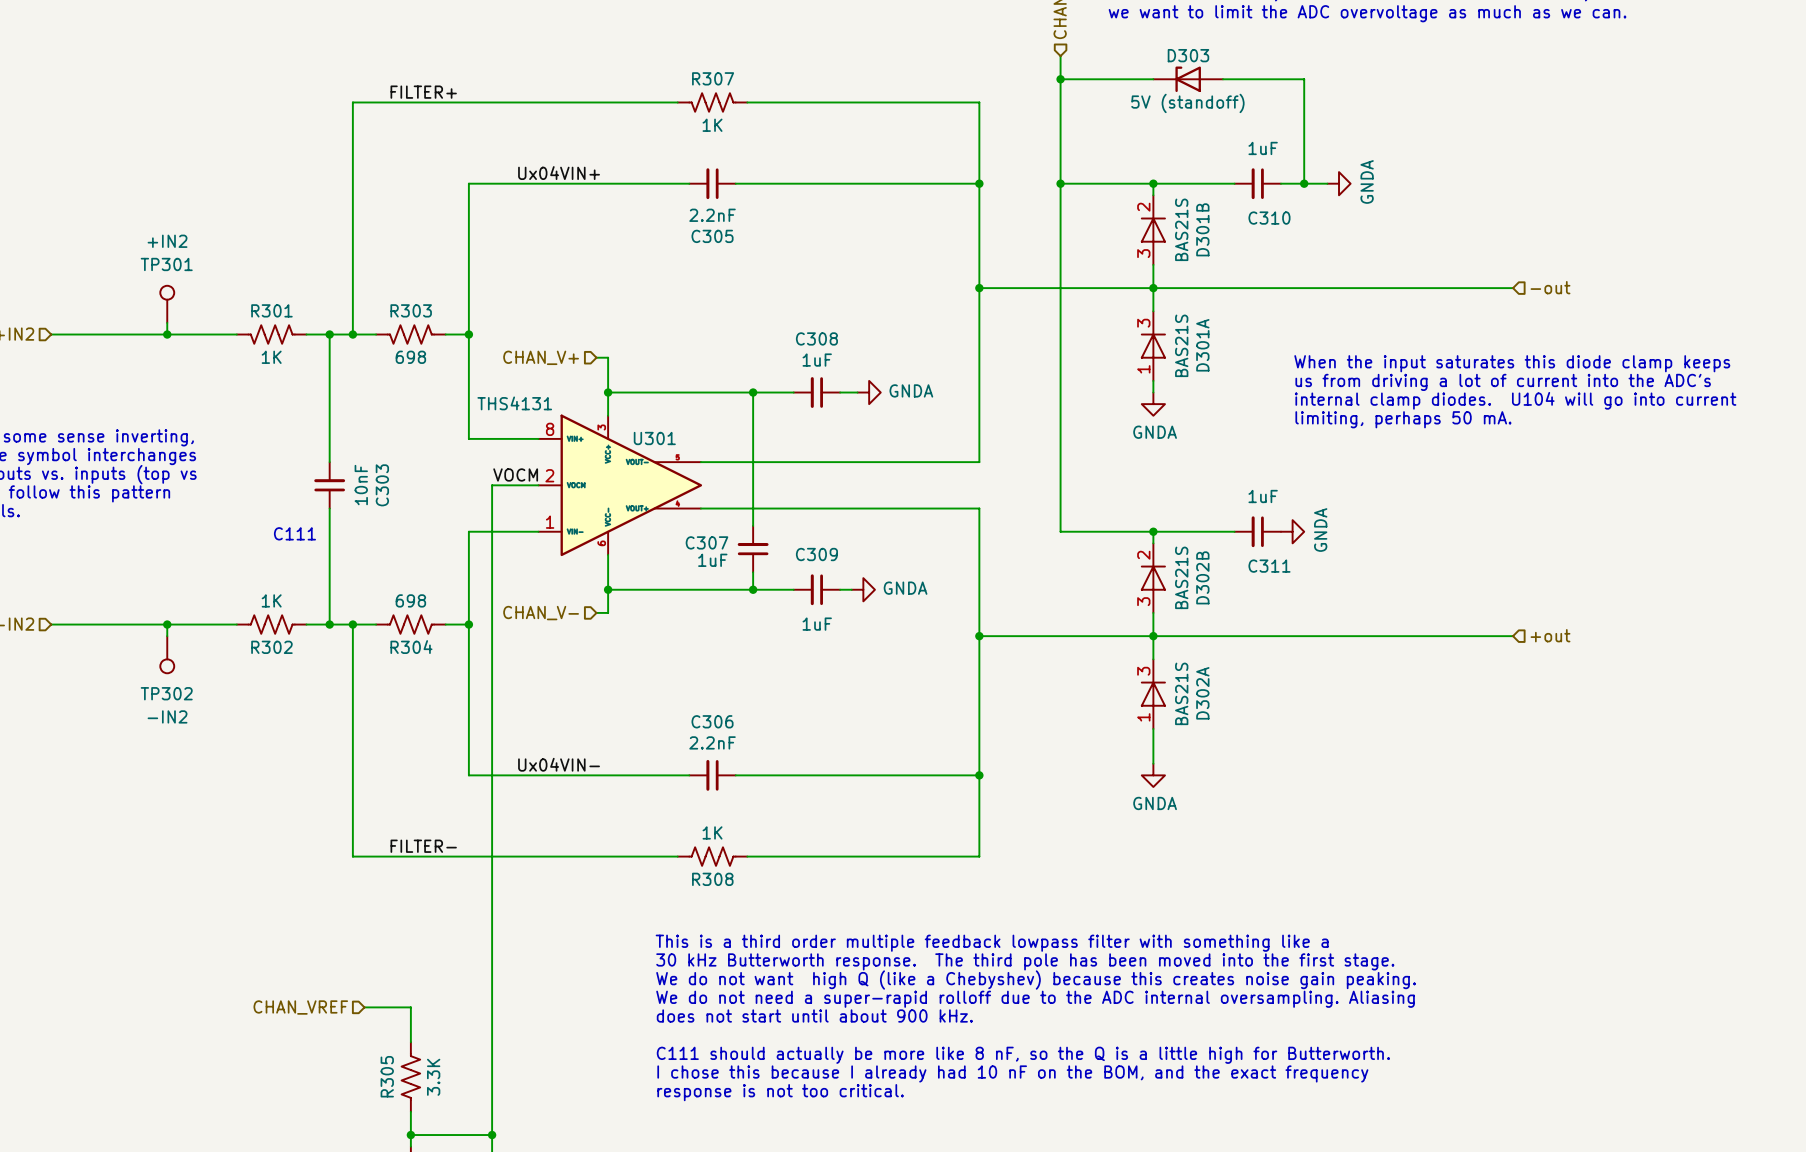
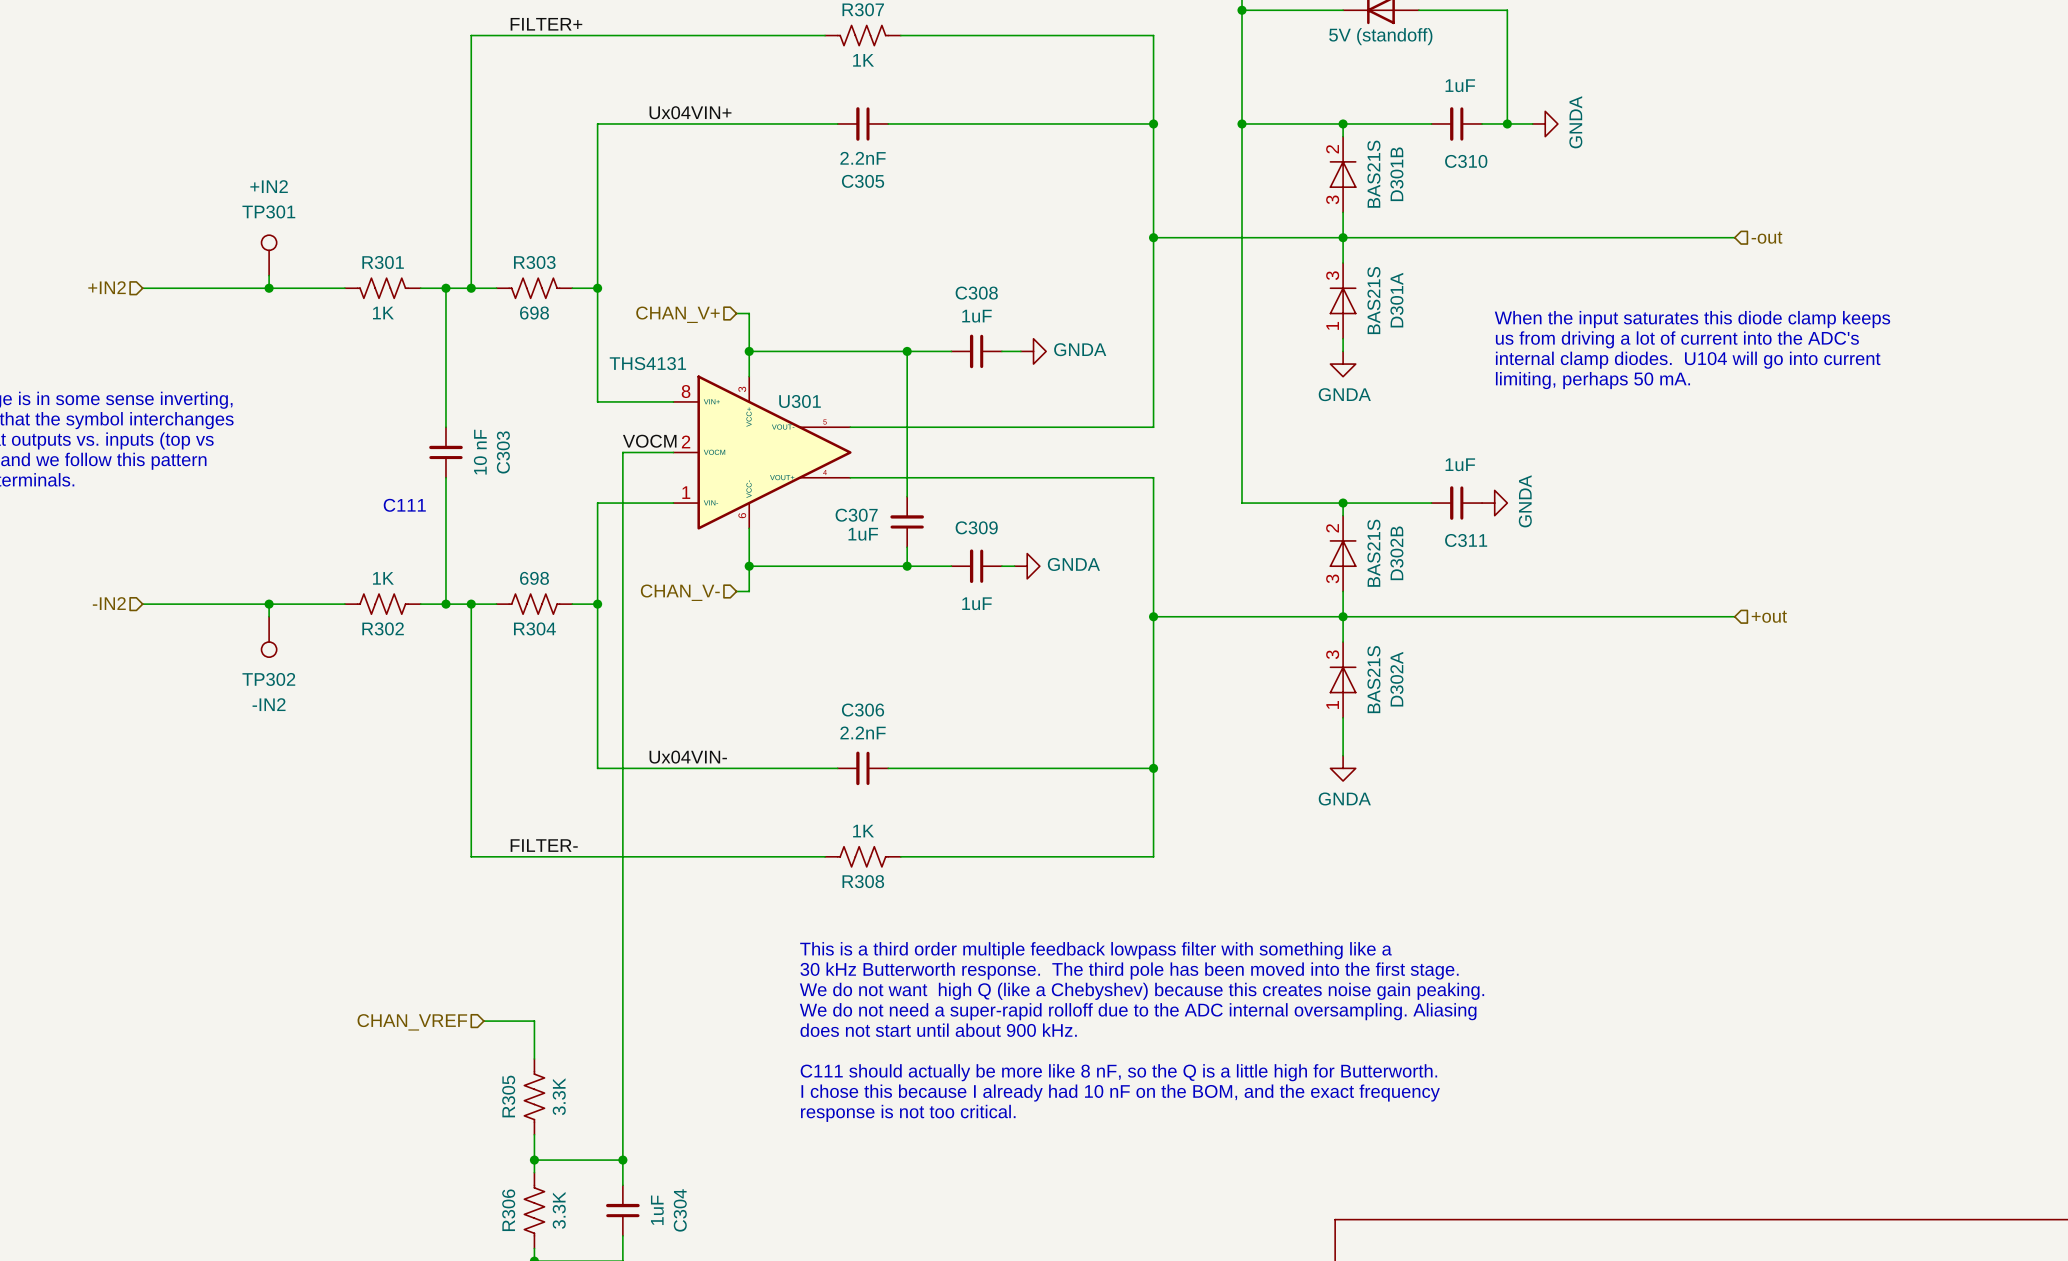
C303 value: 10nF (361, 485) -> 10 nF (480, 452)

